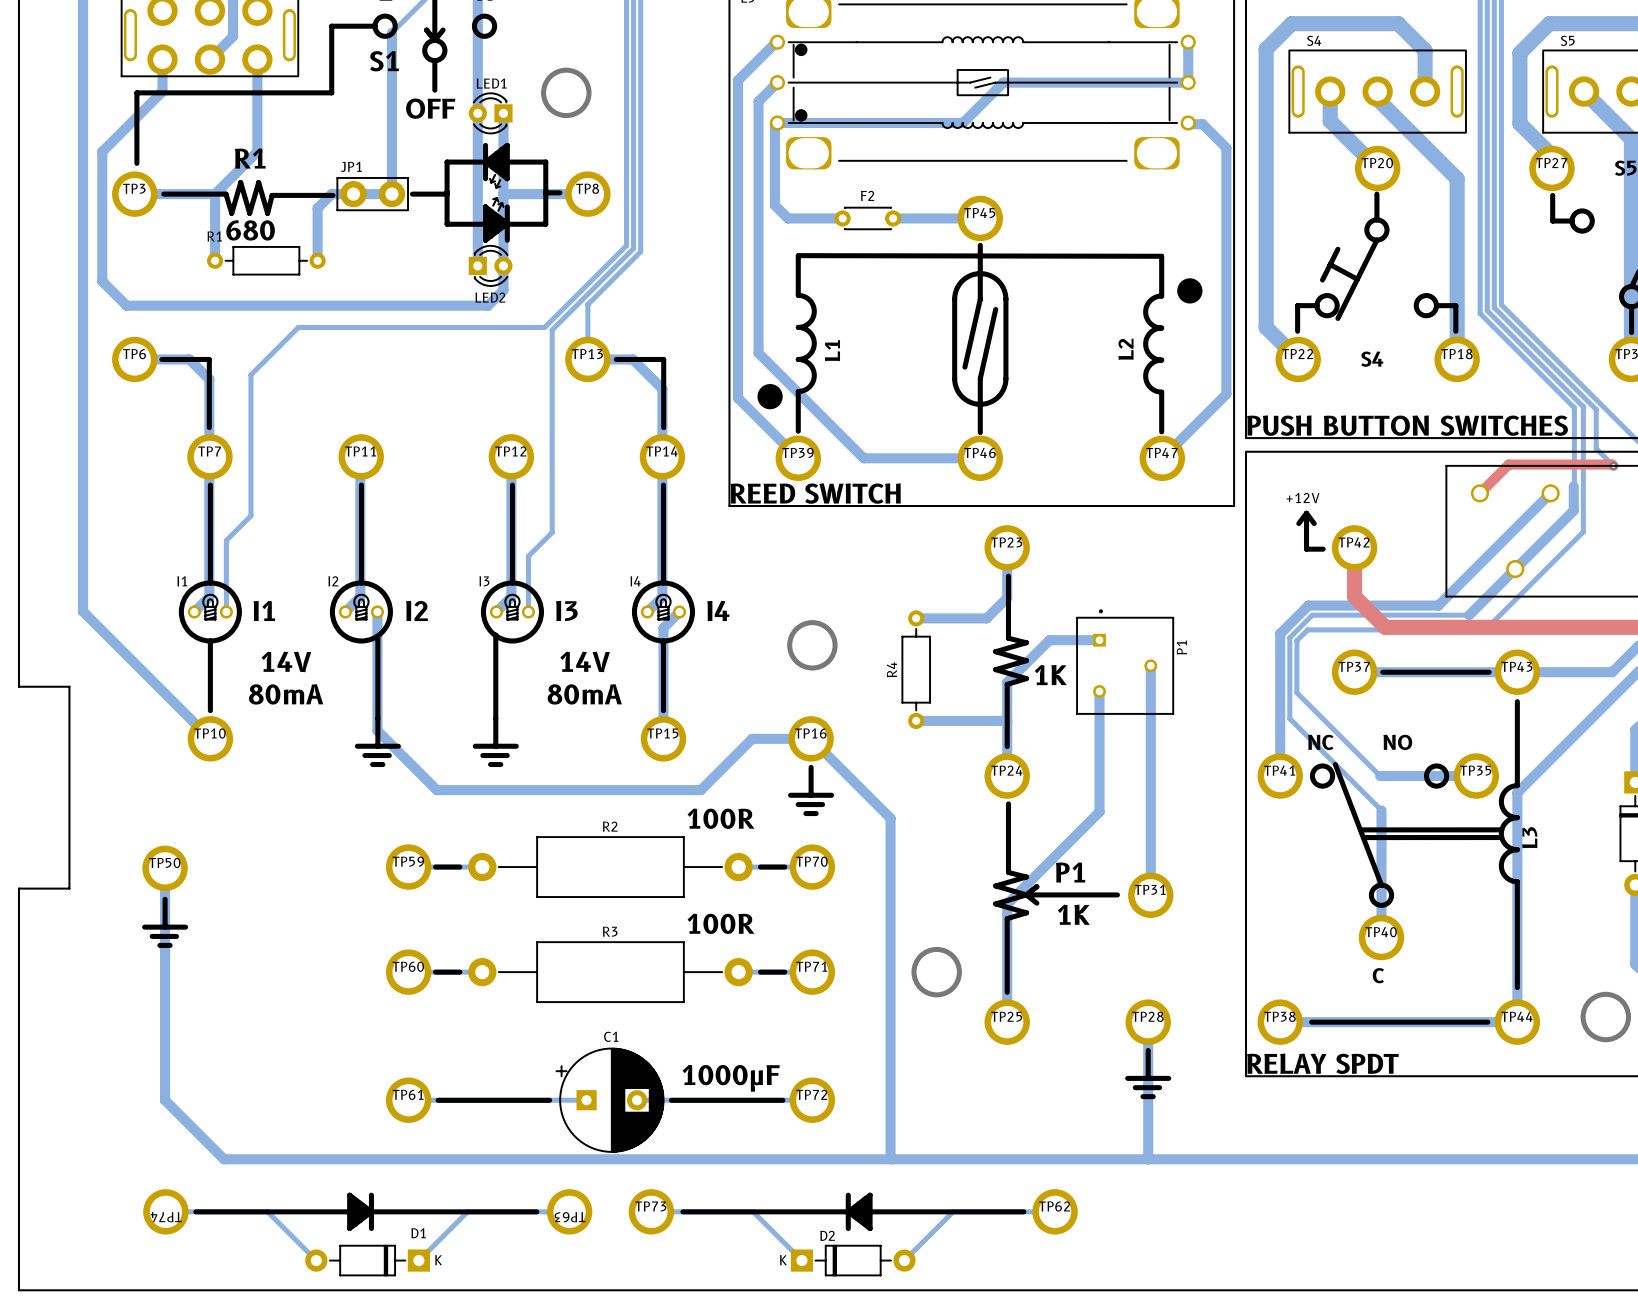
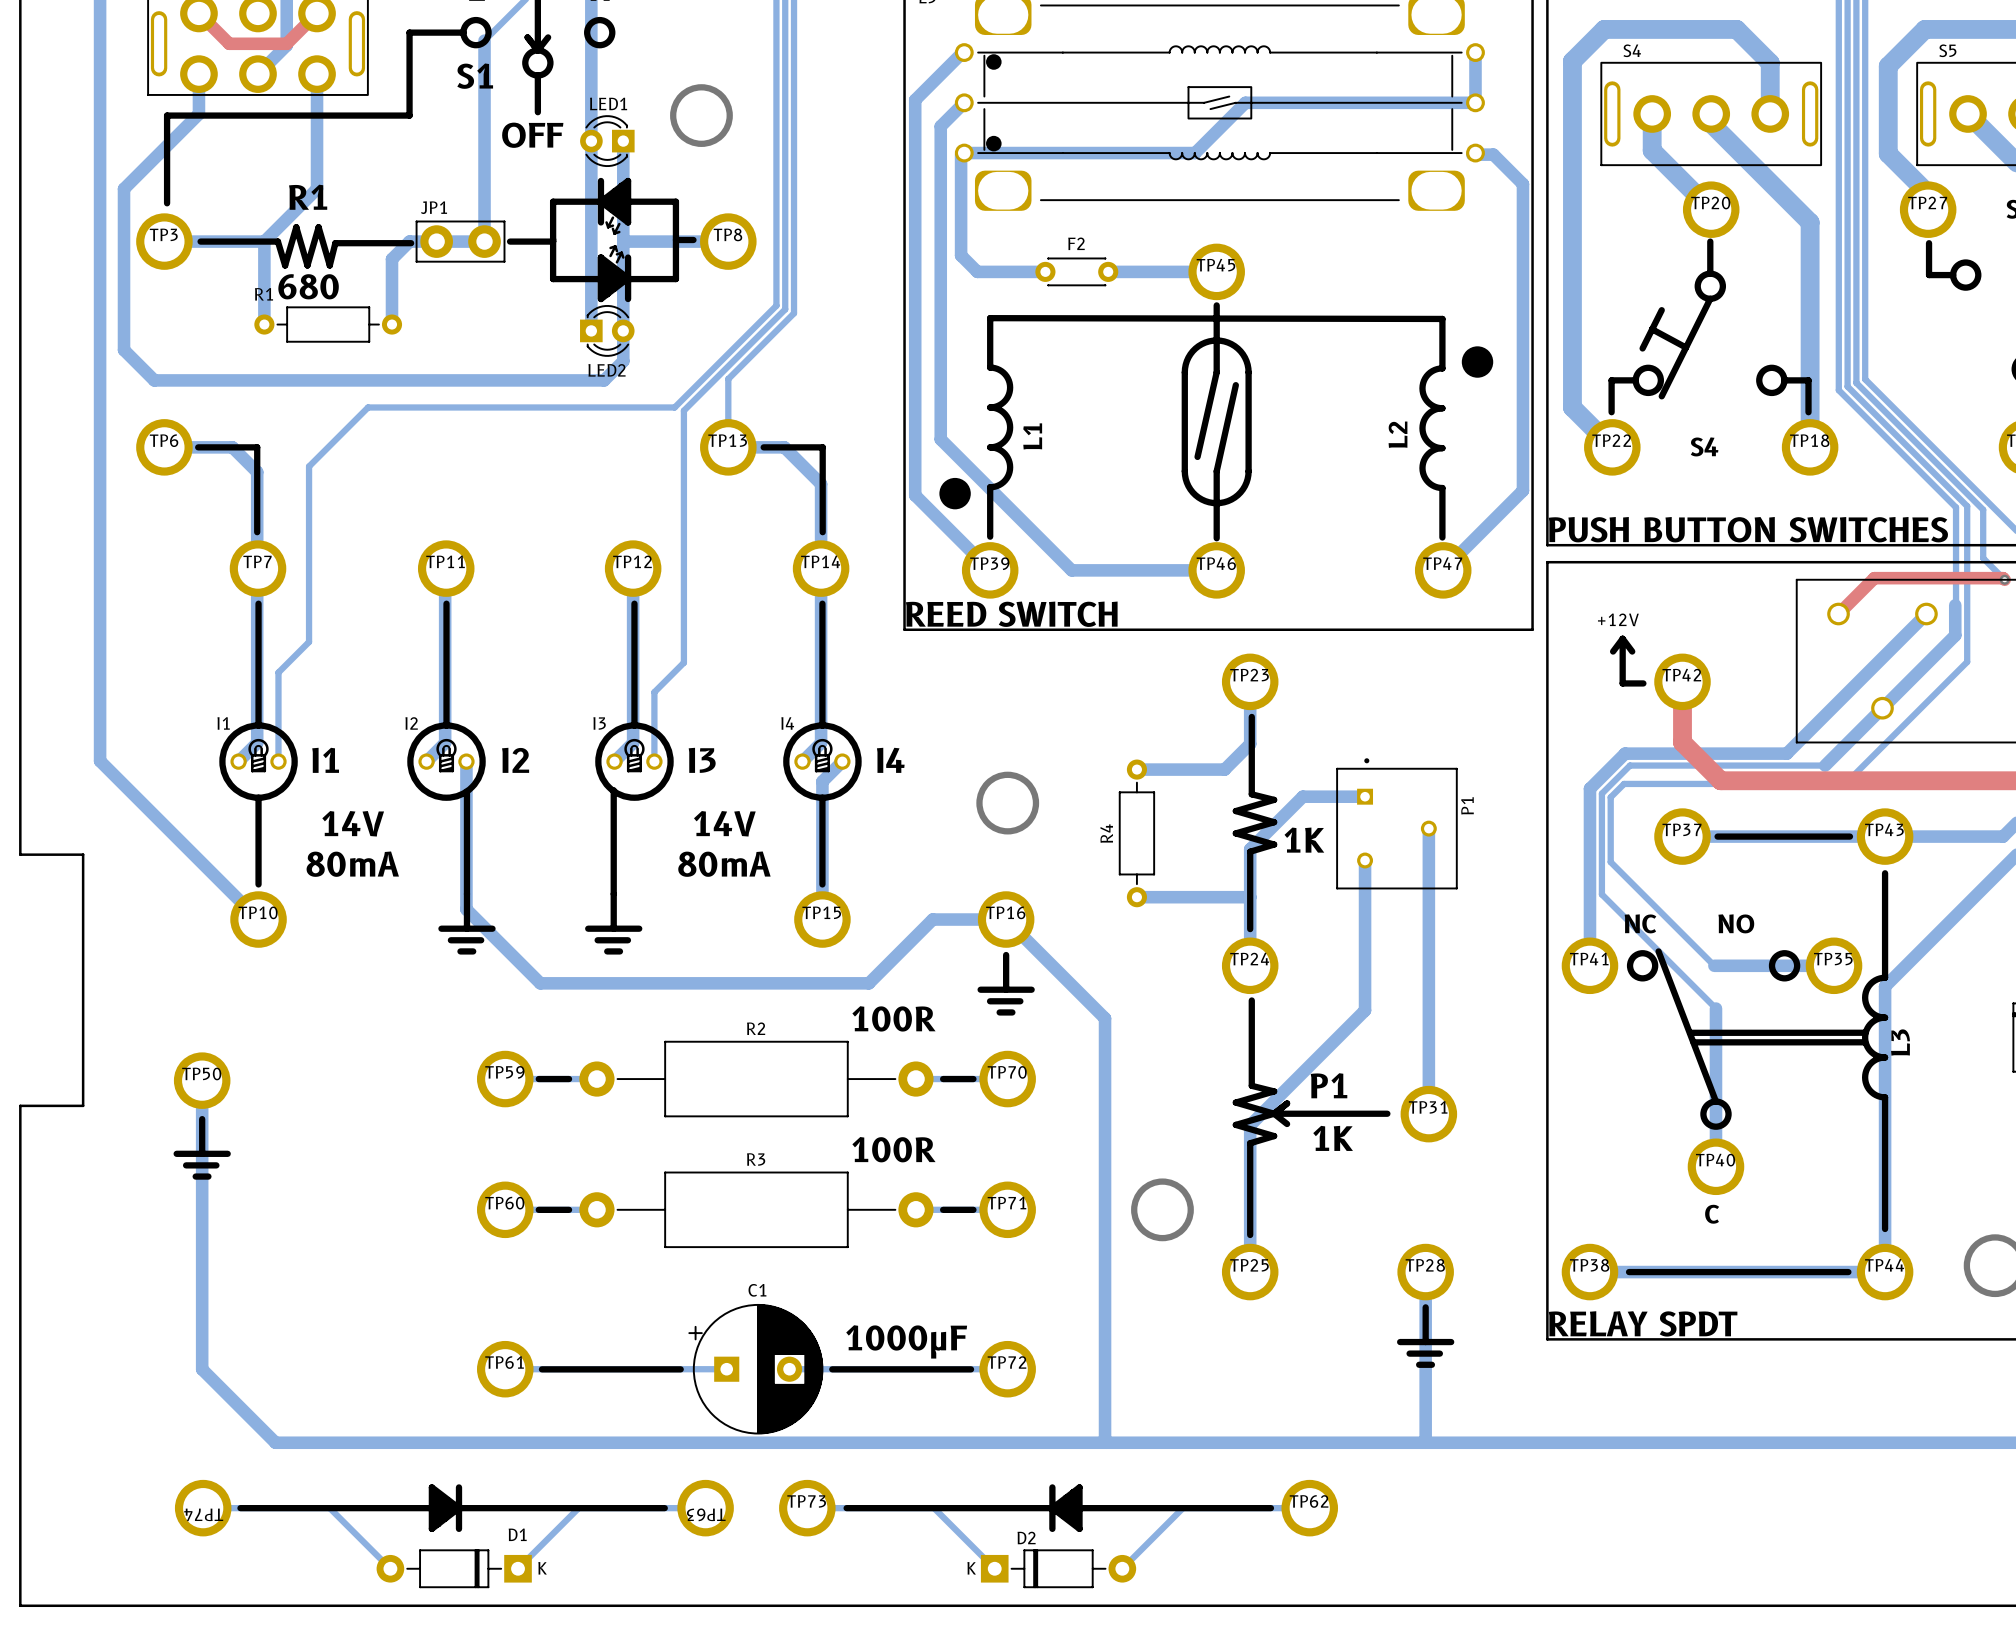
top track: none -> (198, 13) (229, 43) (286, 43) (317, 13)

